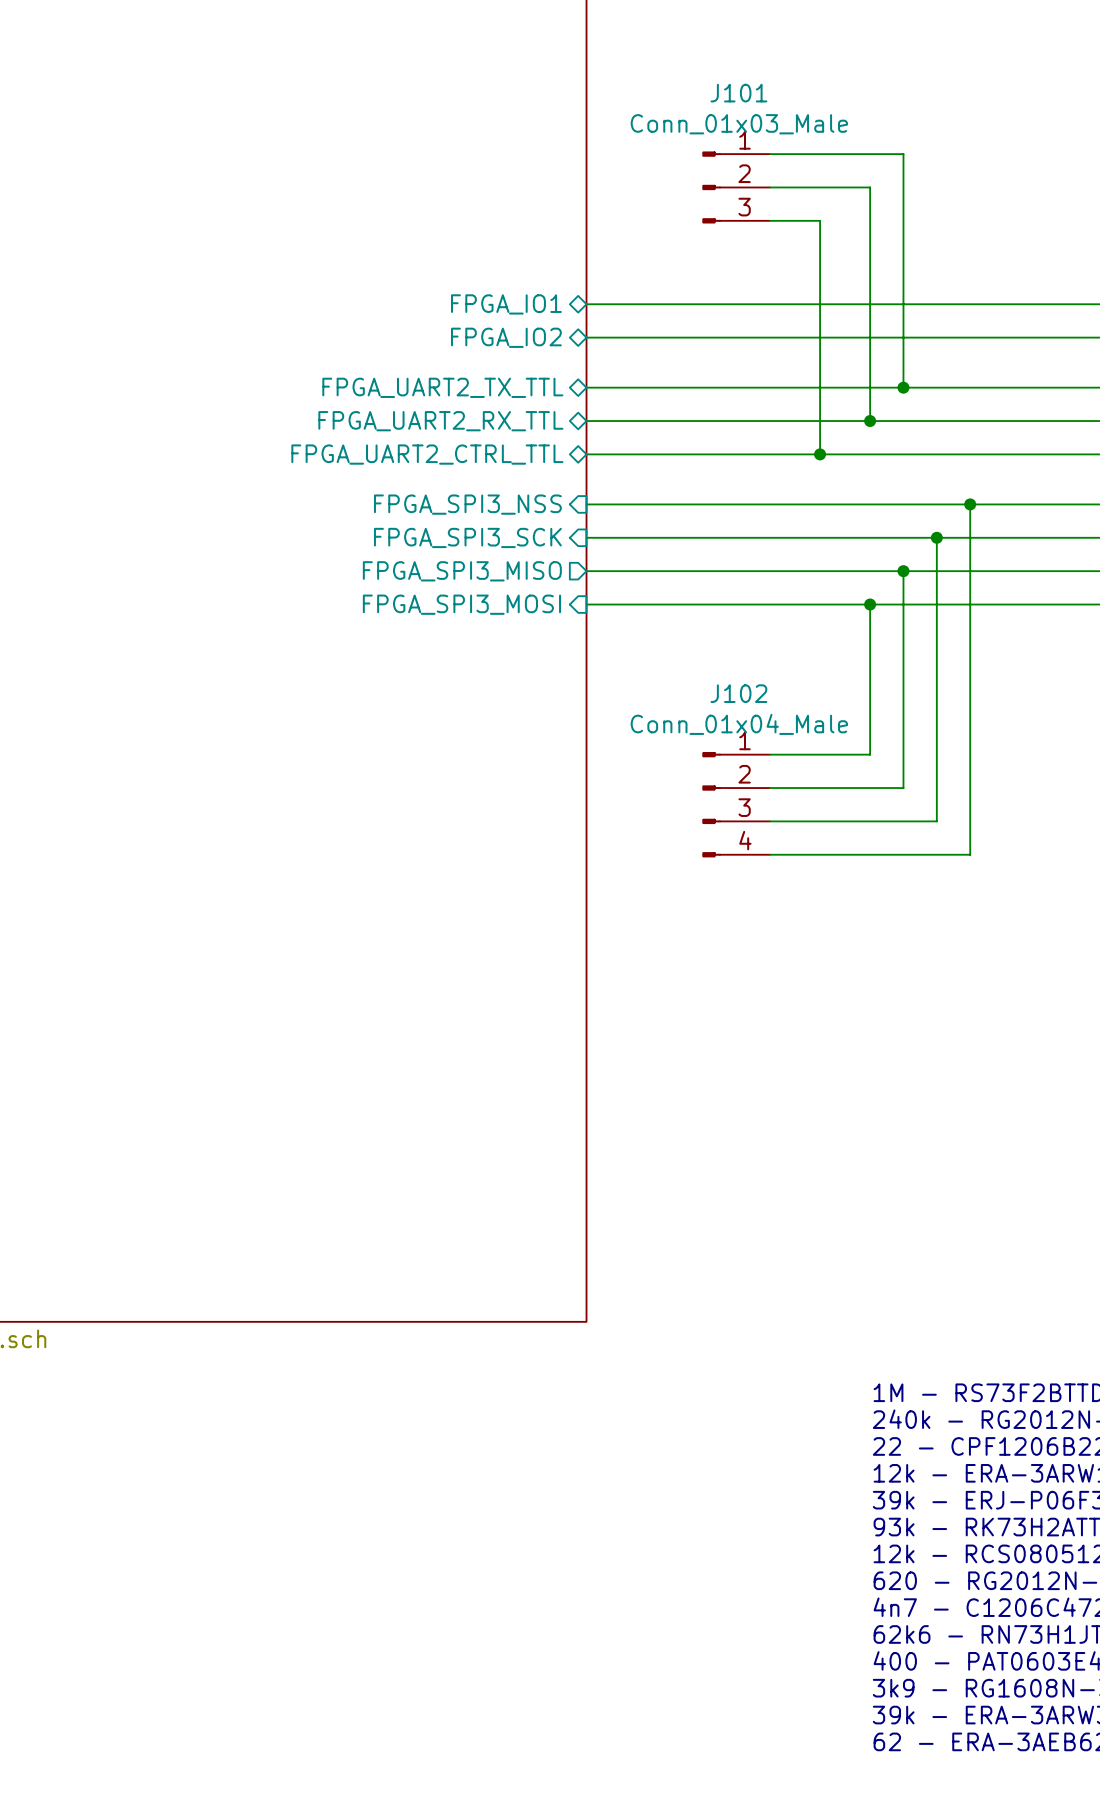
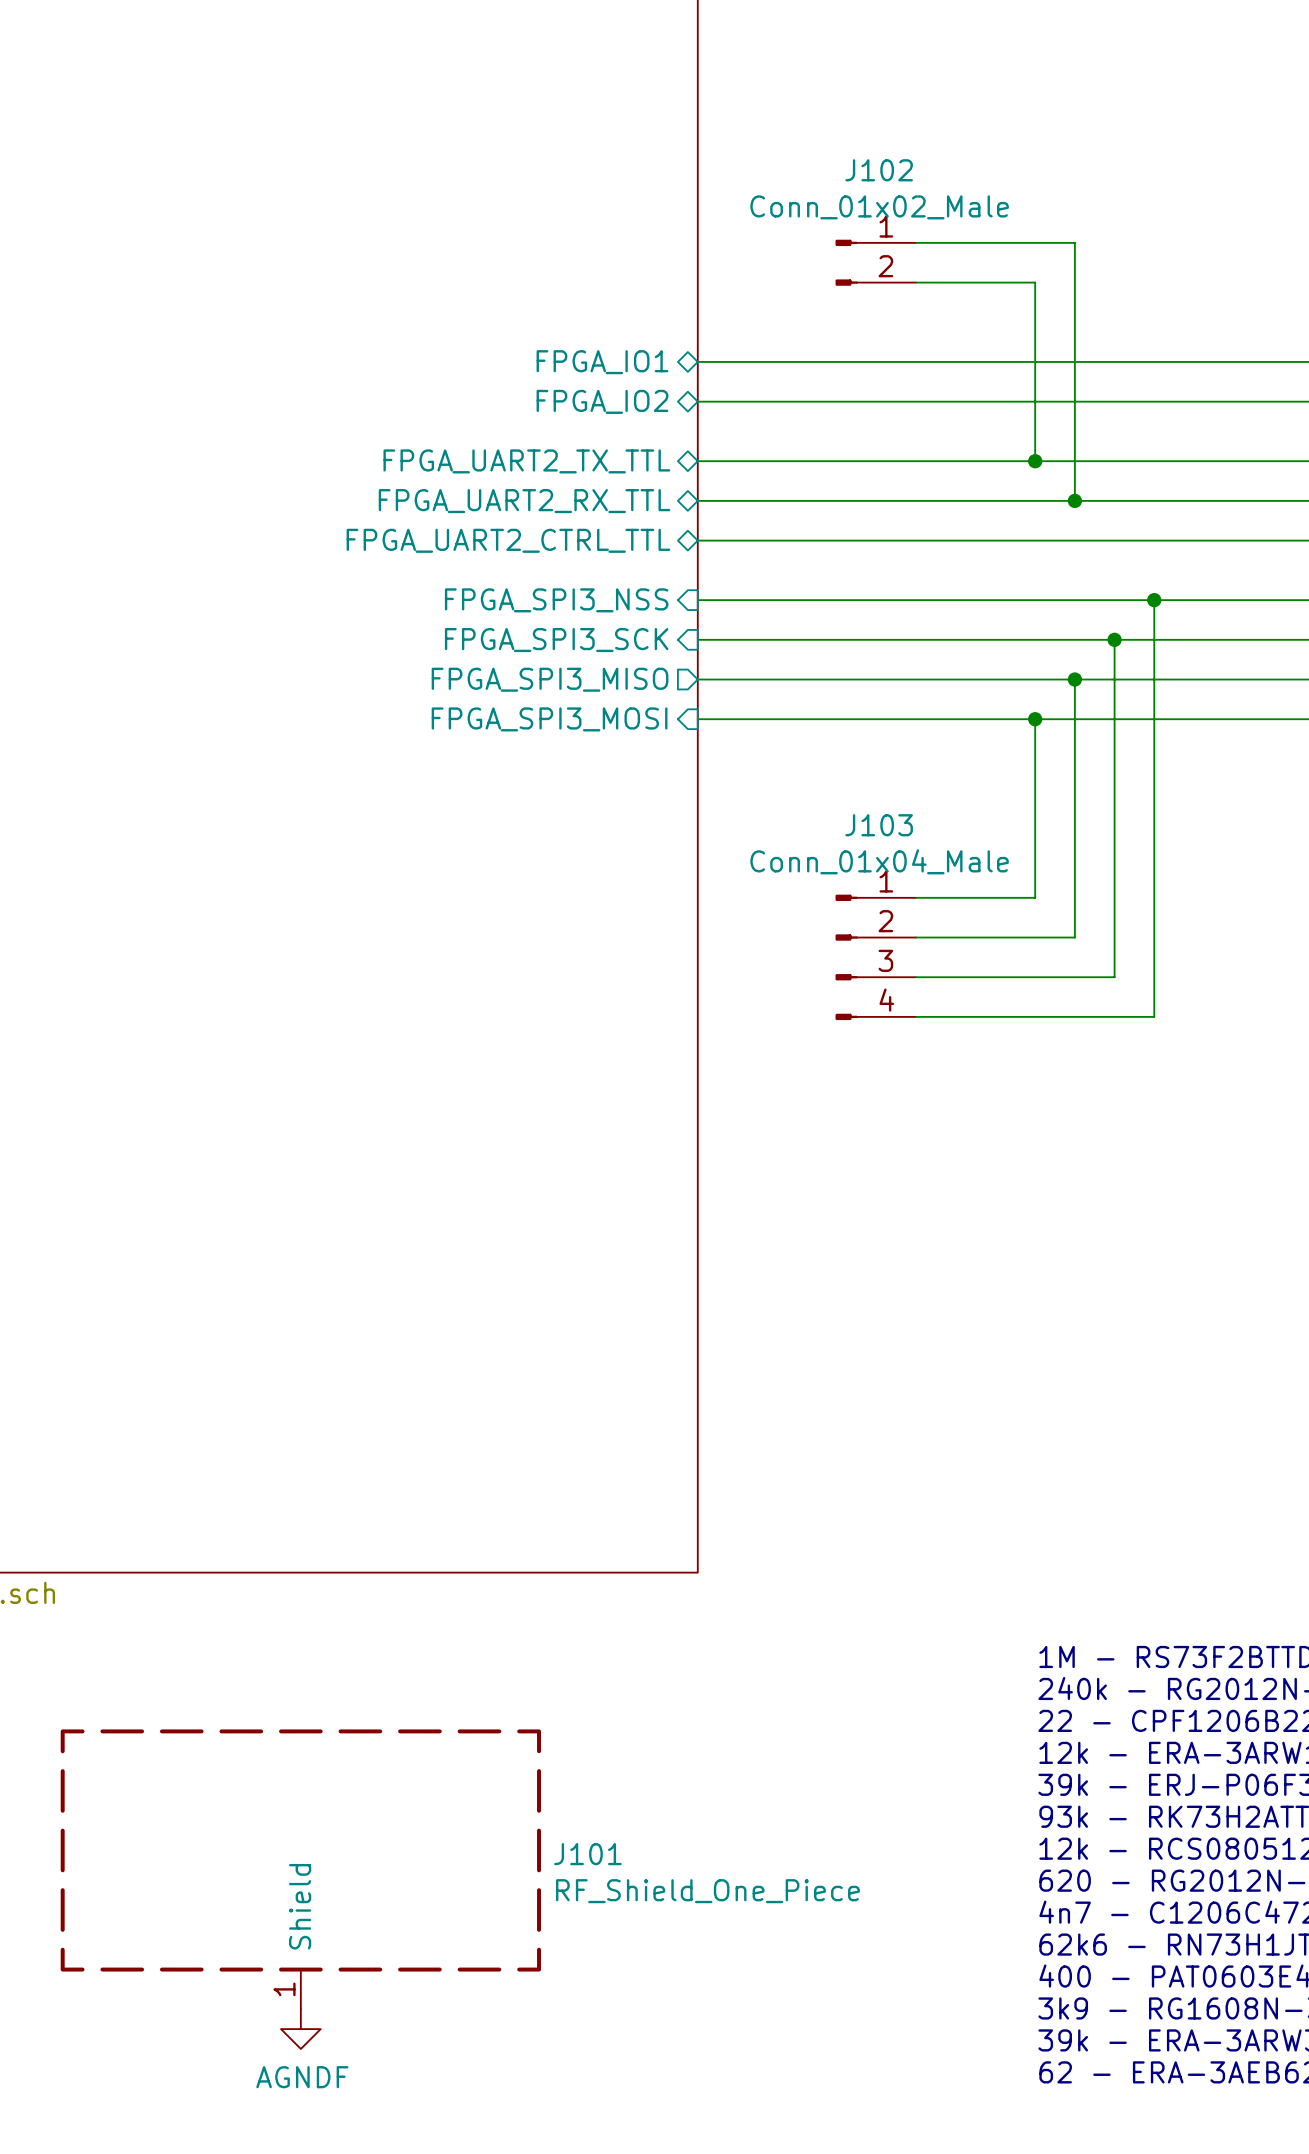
J101 name position: J101 (738, 93) -> J101 (587, 1854)
J101 value: Conn_01x03_Male (739, 124) -> RF_Shield_One_Piece (707, 1891)
J101 symbol: [702, 151, 771, 224] -> [60, 1729, 542, 2010]
wire: (770, 154) (903, 154) (903, 204) -> (916, 242) (1074, 242)
wire: (770, 187) (870, 187) (870, 237) -> (916, 282) (1035, 282)
J102: none -> Conn_01x02_Male (875, 262)
wire: (770, 220) (820, 220) (820, 454) -> none
wire: (870, 387) (870, 421) -> (1074, 461) (1074, 500)
junction: none -> (1035, 461)
junction: (903, 387) -> none
junction: (870, 421) -> none
junction: none -> (1074, 500)
junction: (820, 454) -> none
J102 name: J102 (738, 693) -> J103 (879, 825)
power symbol: none -> AGNDF (300, 2029)

